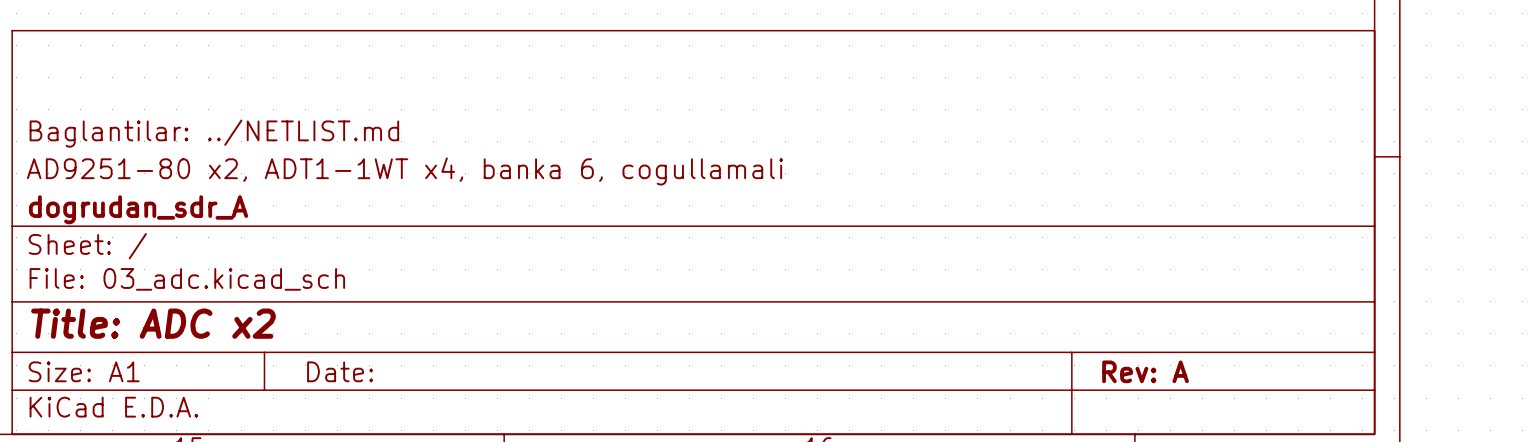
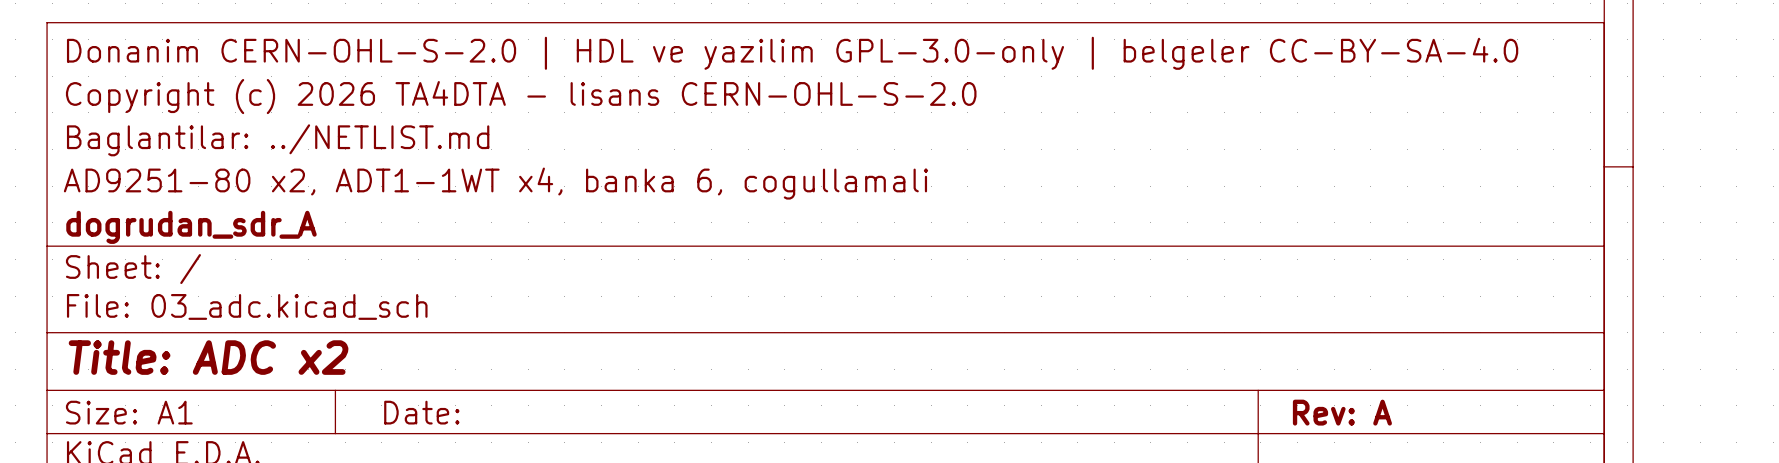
title block: none -> Donanim CERN-OHL-S-2.0 | HDL ve yazilim GPL-3.0-only | belgeler CC-BY-SA-4.0 (792, 53)
title block: none -> Copyright (c) 2026 TA4DTA - lisans CERN-OHL-S-2.0 (521, 96)

